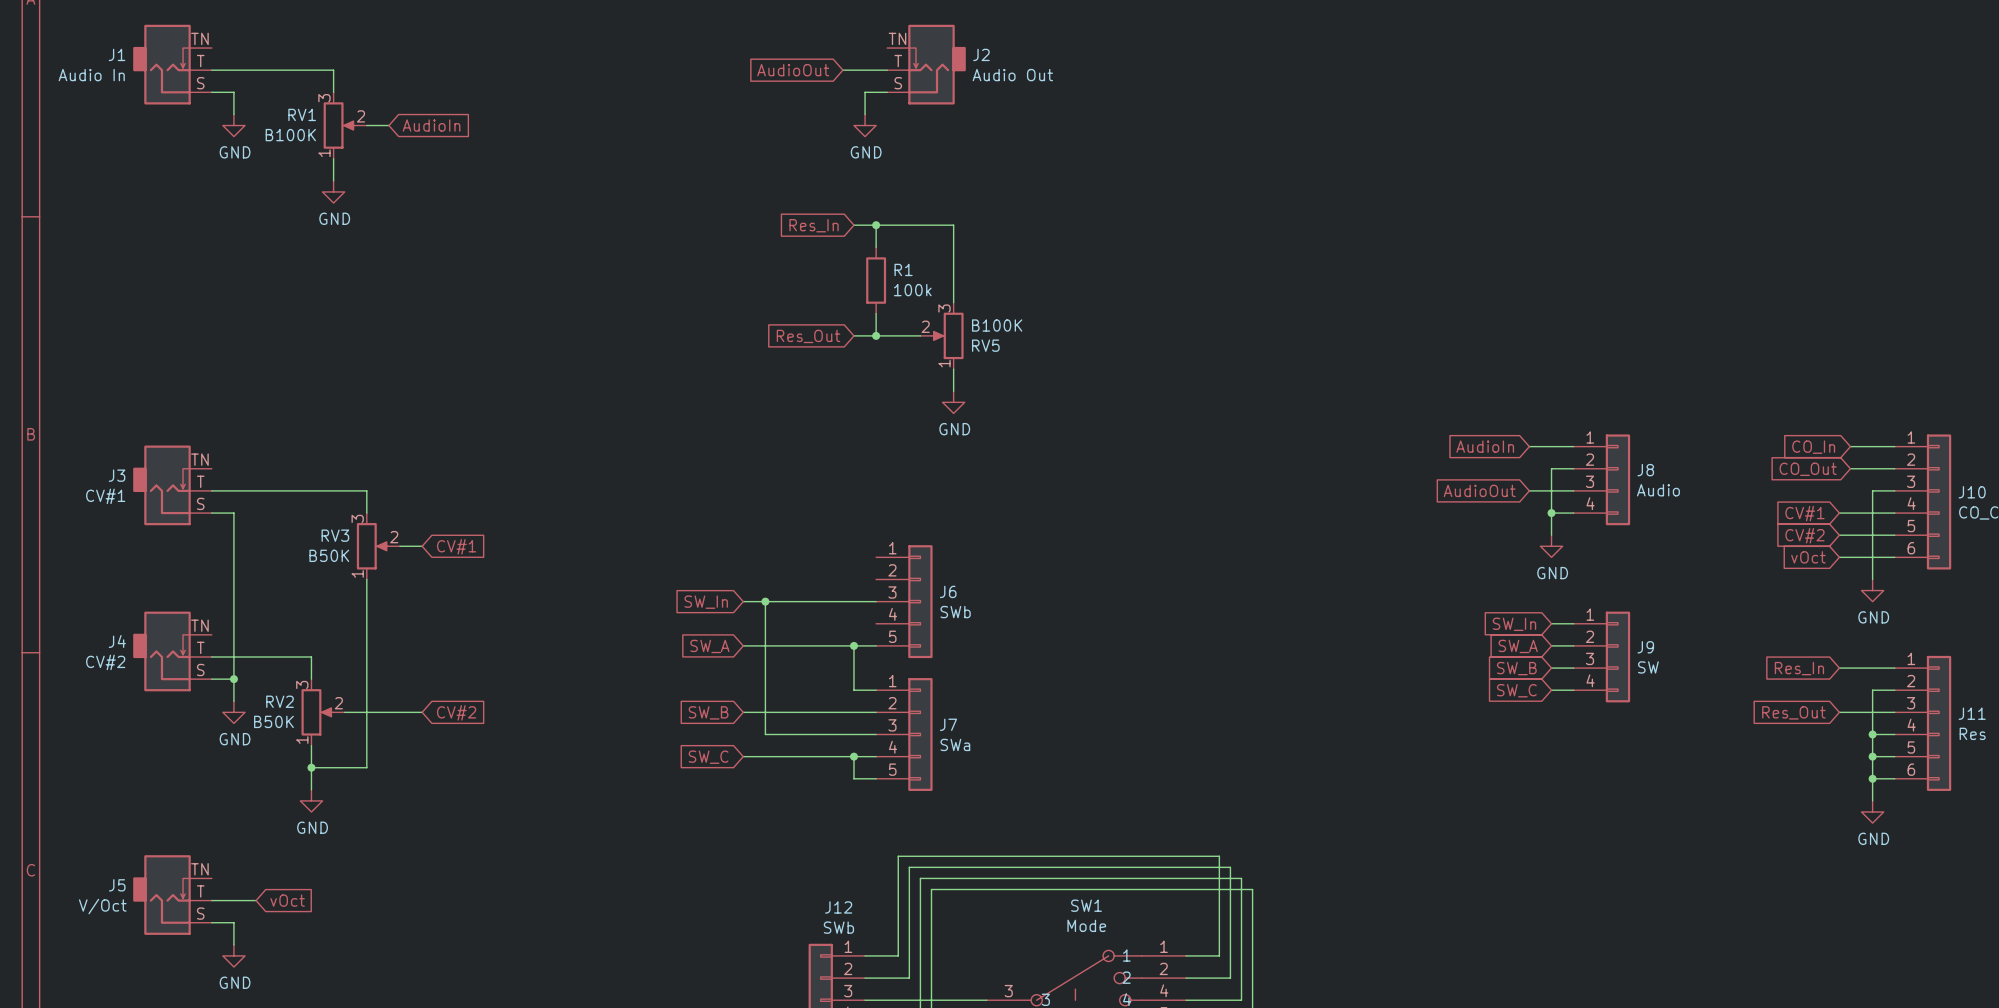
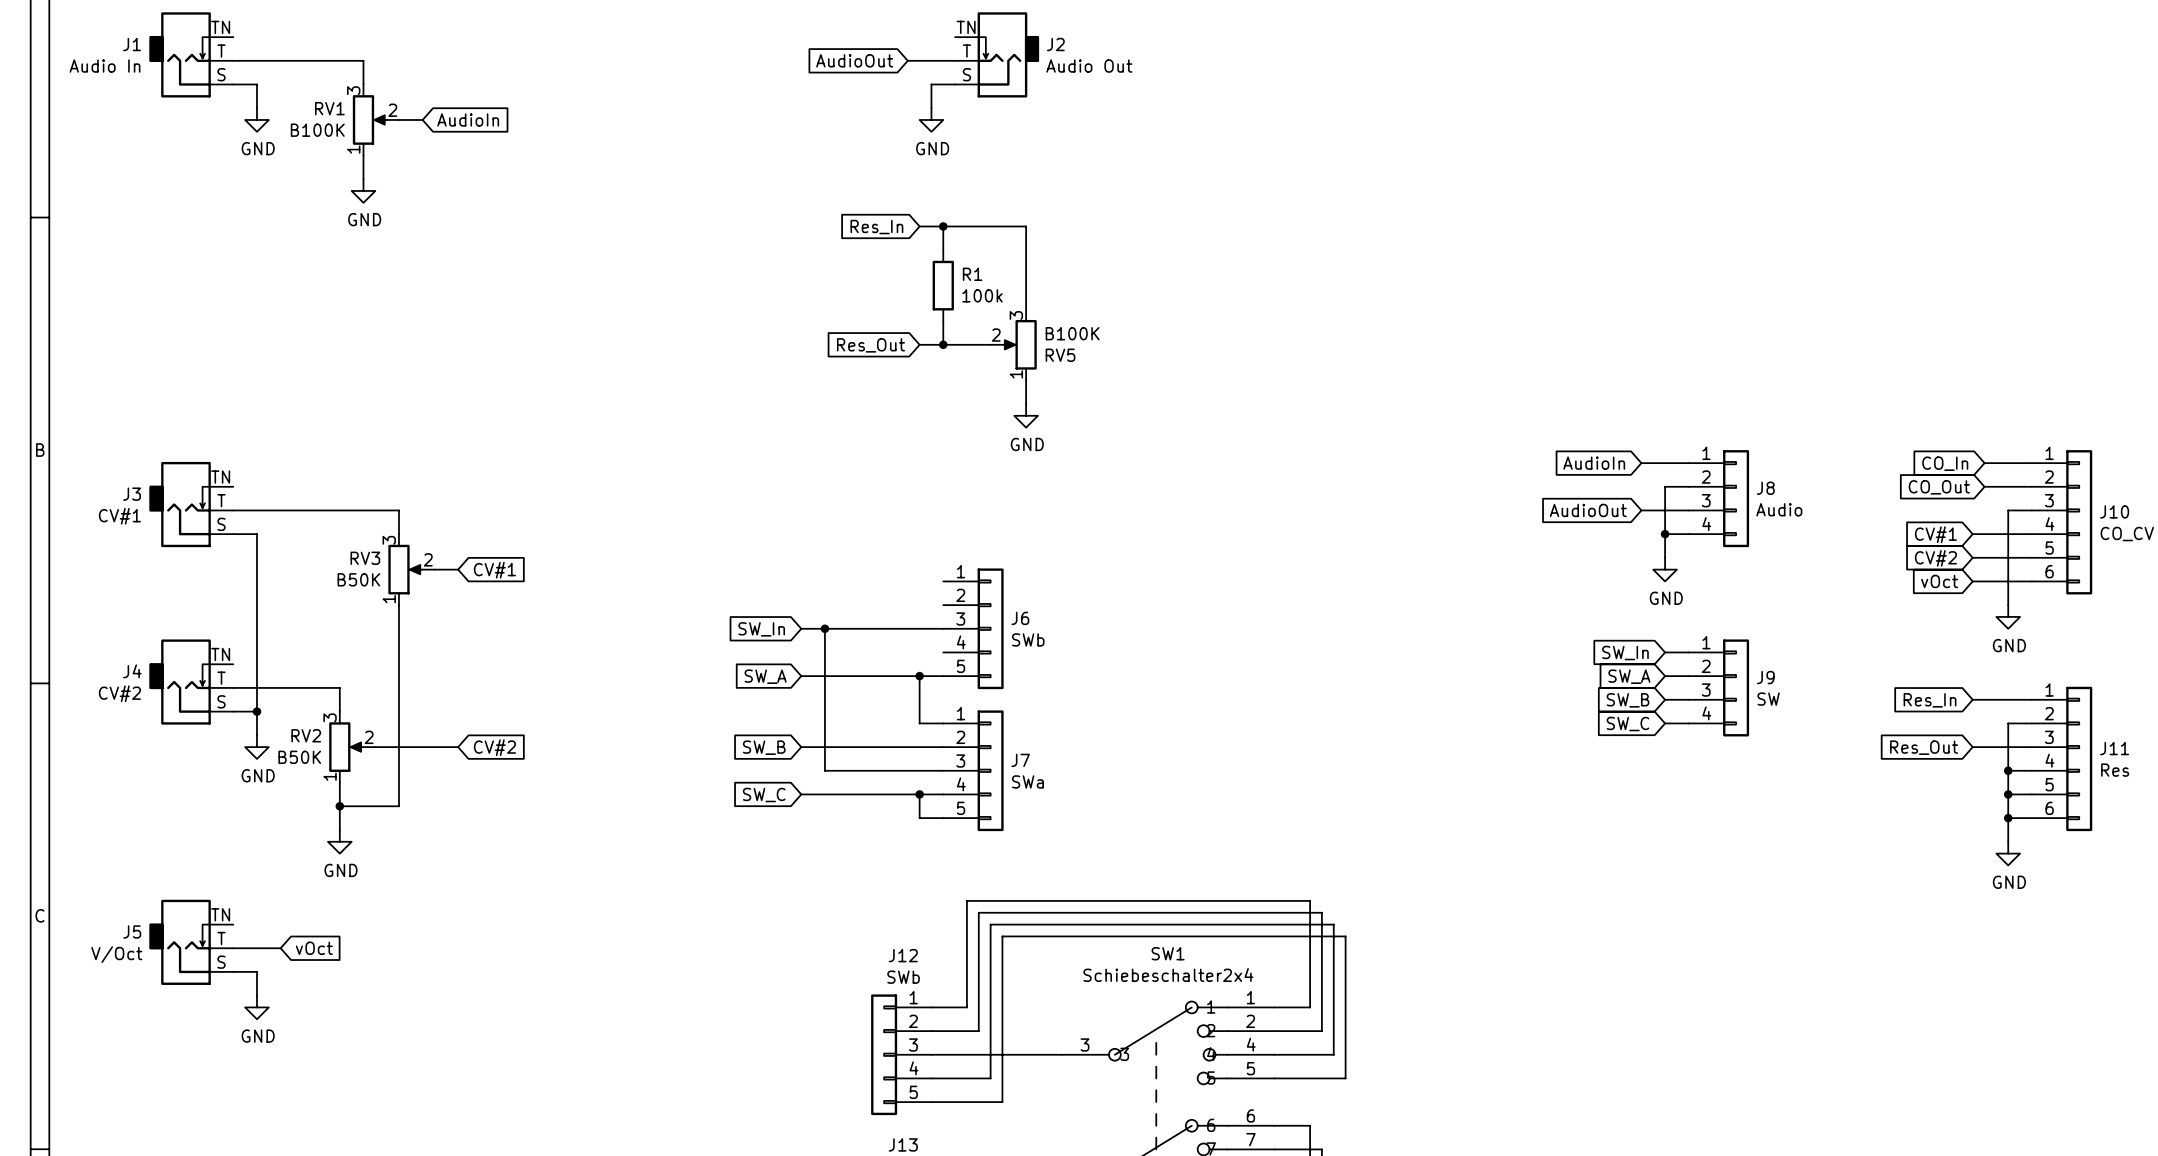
SW1 value: Mode (1086, 925) -> Schiebeschalter2x4 (1168, 974)

